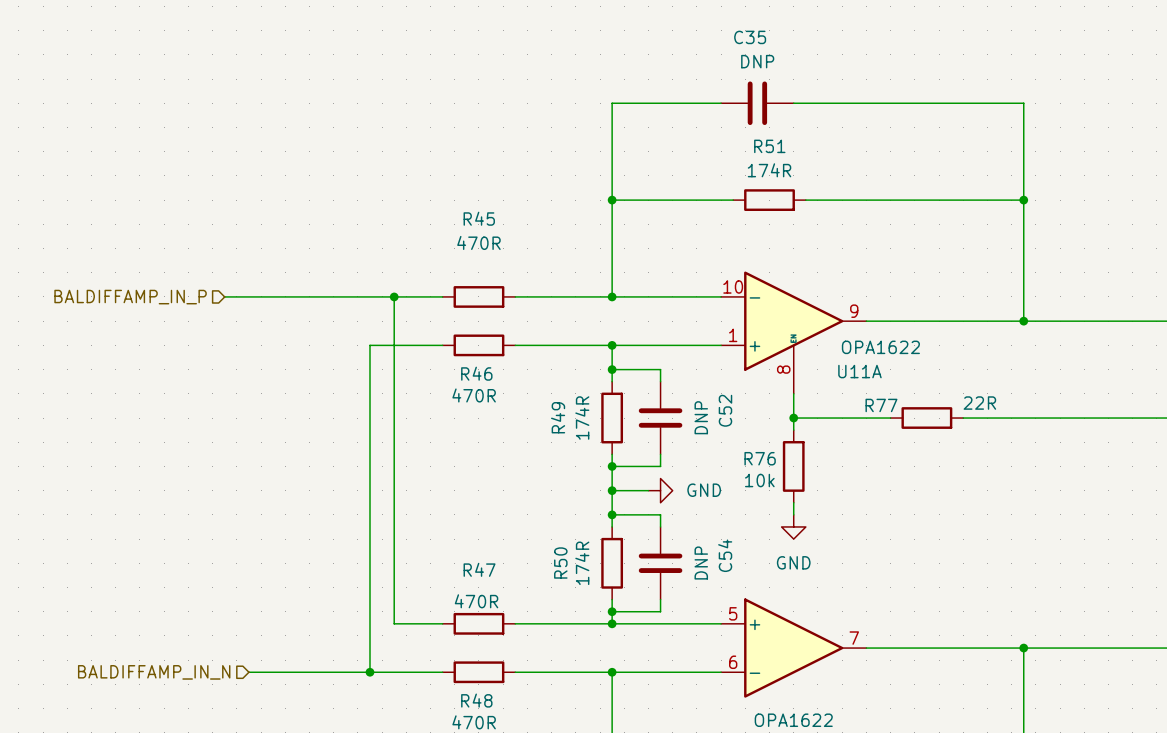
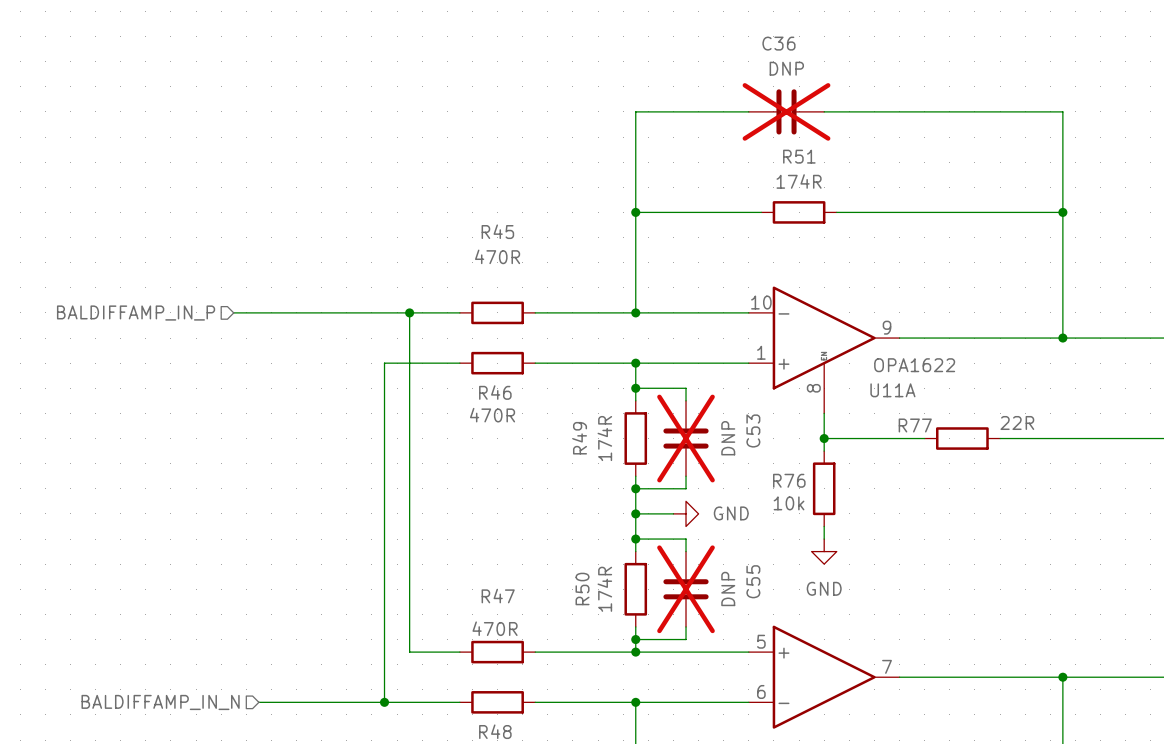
C35 name: C35 (750, 37) -> C36 (778, 43)
C35 do-not-place cross: none -> (786, 111)
C52 name: C52 (725, 410) -> C53 (753, 430)
C52 do-not-place cross: none -> (686, 438)
C54 name: C54 (725, 555) -> C55 (753, 581)
C54 do-not-place cross: none -> (686, 589)

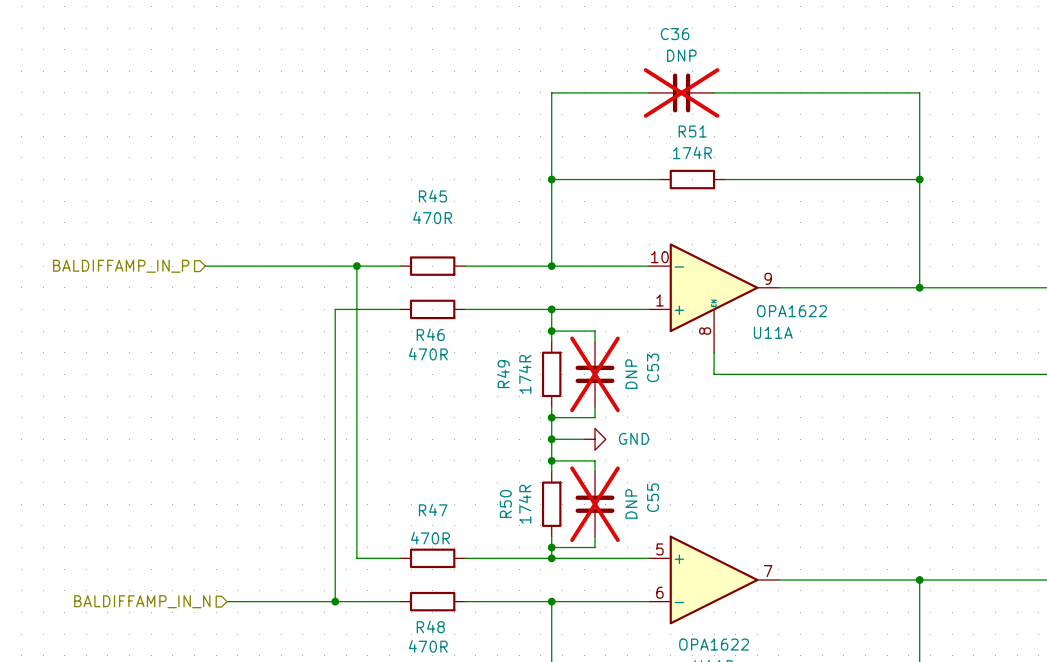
wire: (824, 438) (824, 451) -> none
junction: (824, 438) -> none
wire: none -> (800, 374) (865, 374)
R77: 22R (962, 438) -> none
R76: 10k (824, 488) -> none
wire: (824, 526) (824, 539) -> none
power symbol: GND (824, 551) -> none

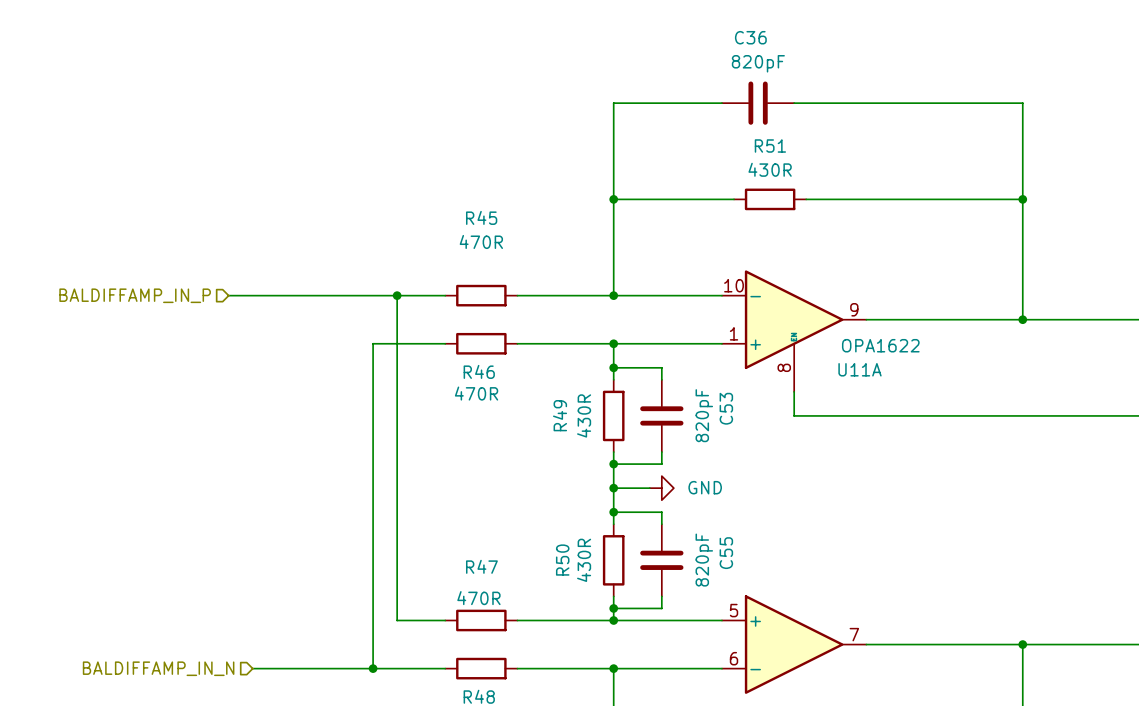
C36 value: DNP (681, 55) -> 820pF (758, 63)
C36 do-not-place cross: (681, 92) -> none
R51 value: 174R (692, 152) -> 430R (770, 169)
R49 value: 174R (525, 374) -> 430R (584, 415)
C53 do-not-place cross: (595, 374) -> none
C53 value: DNP (631, 374) -> 820pF (704, 415)
C55 value: DNP (631, 503) -> 820pF (704, 560)
R50 value: 174R (525, 504) -> 430R (584, 560)
C55 do-not-place cross: (595, 504) -> none

